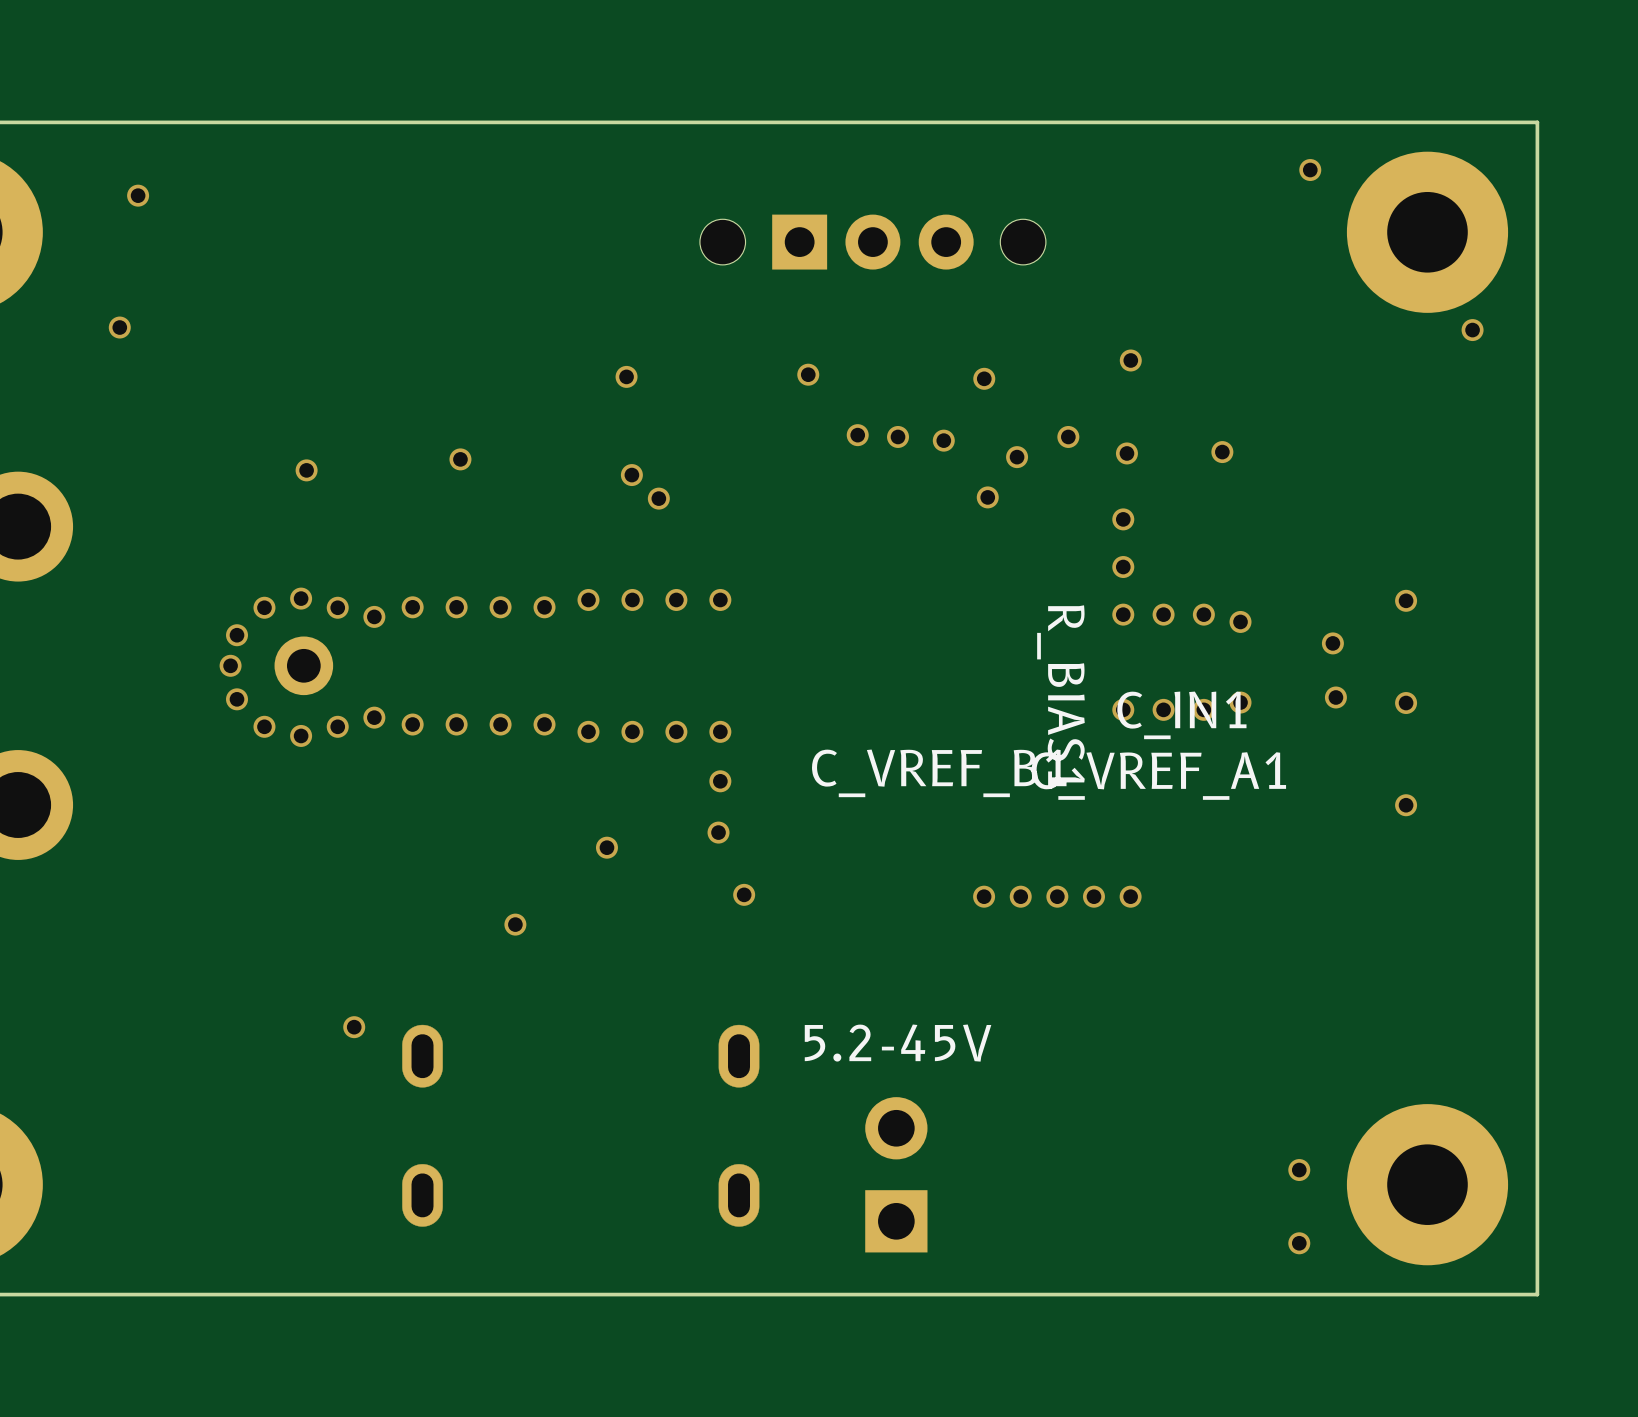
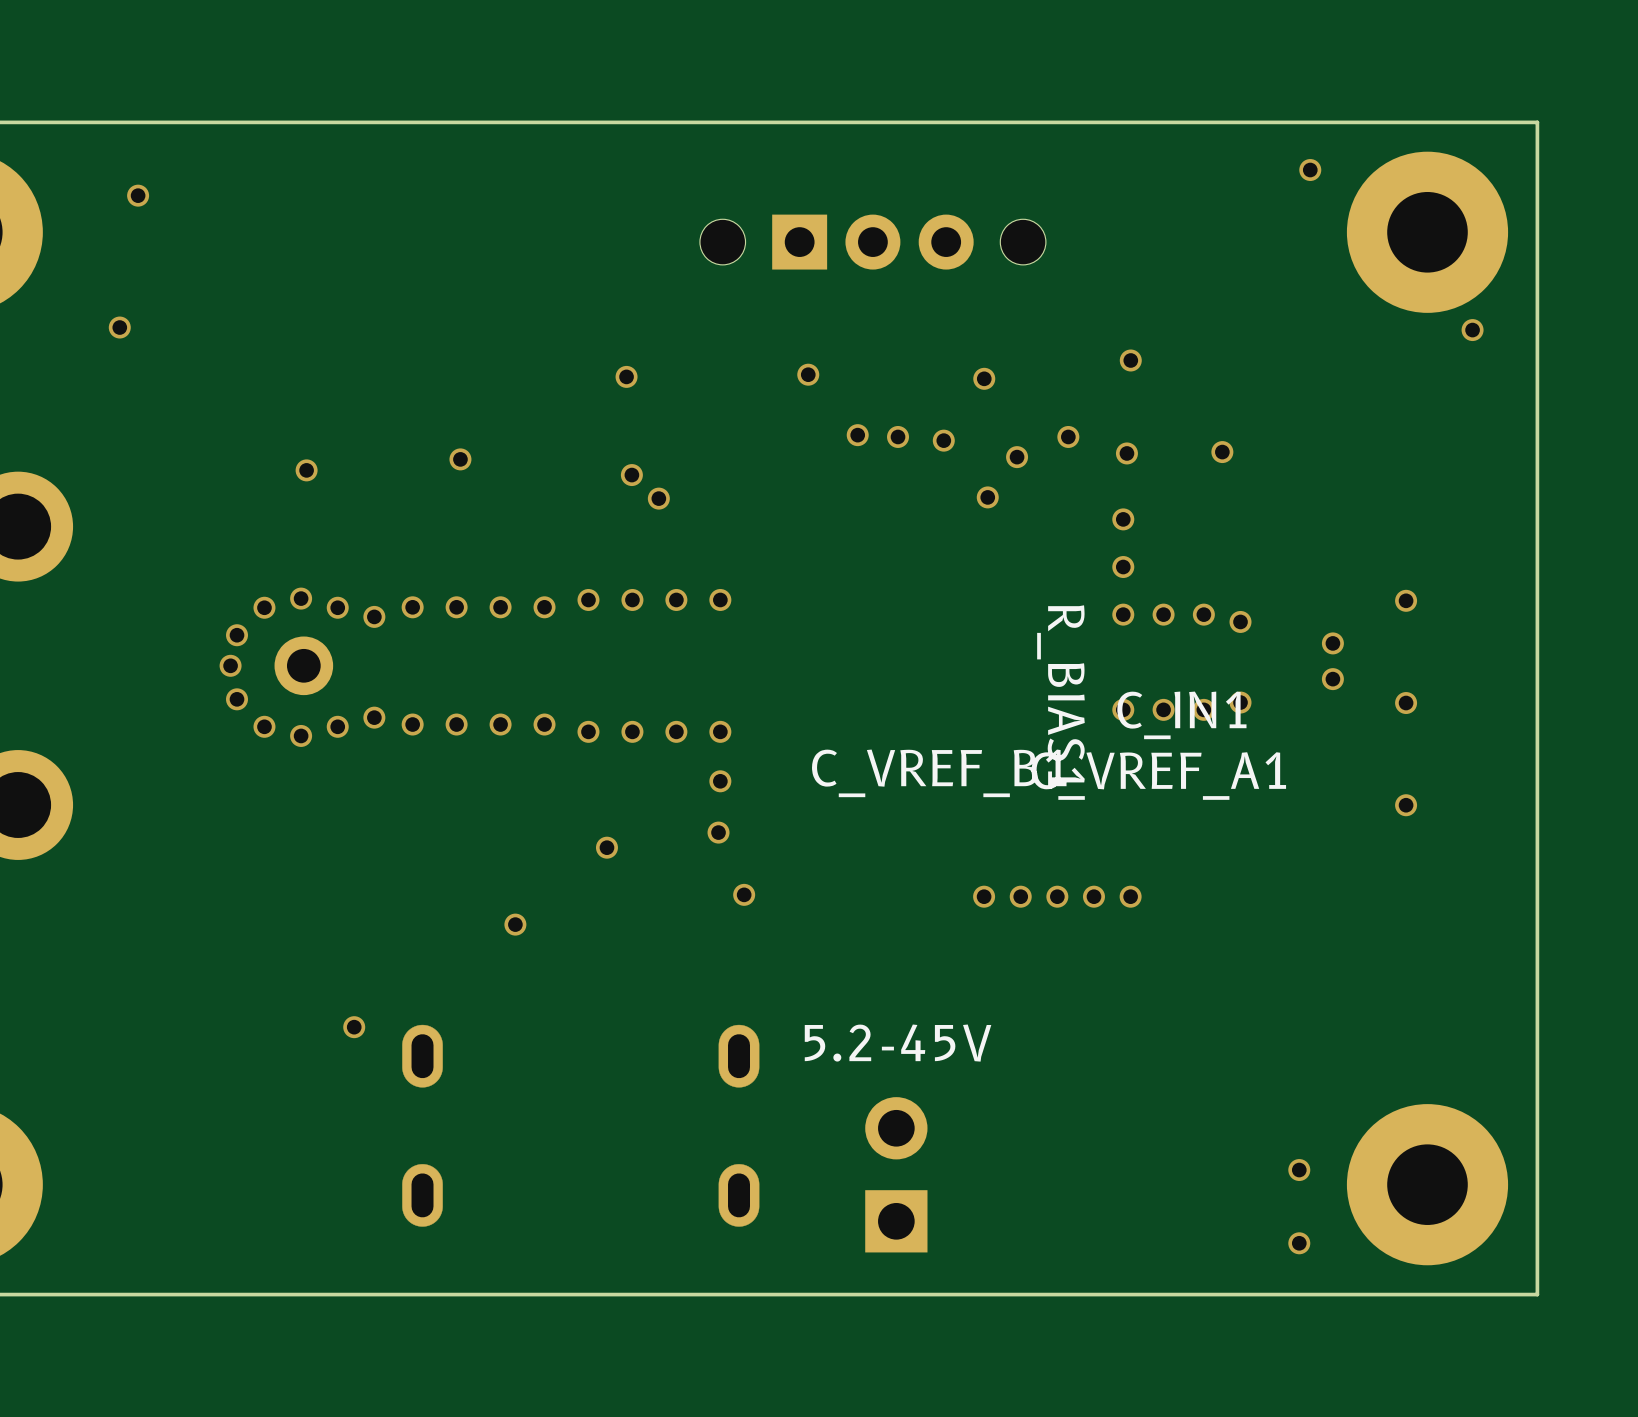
via position: (1335, 697) -> (1332, 679)

